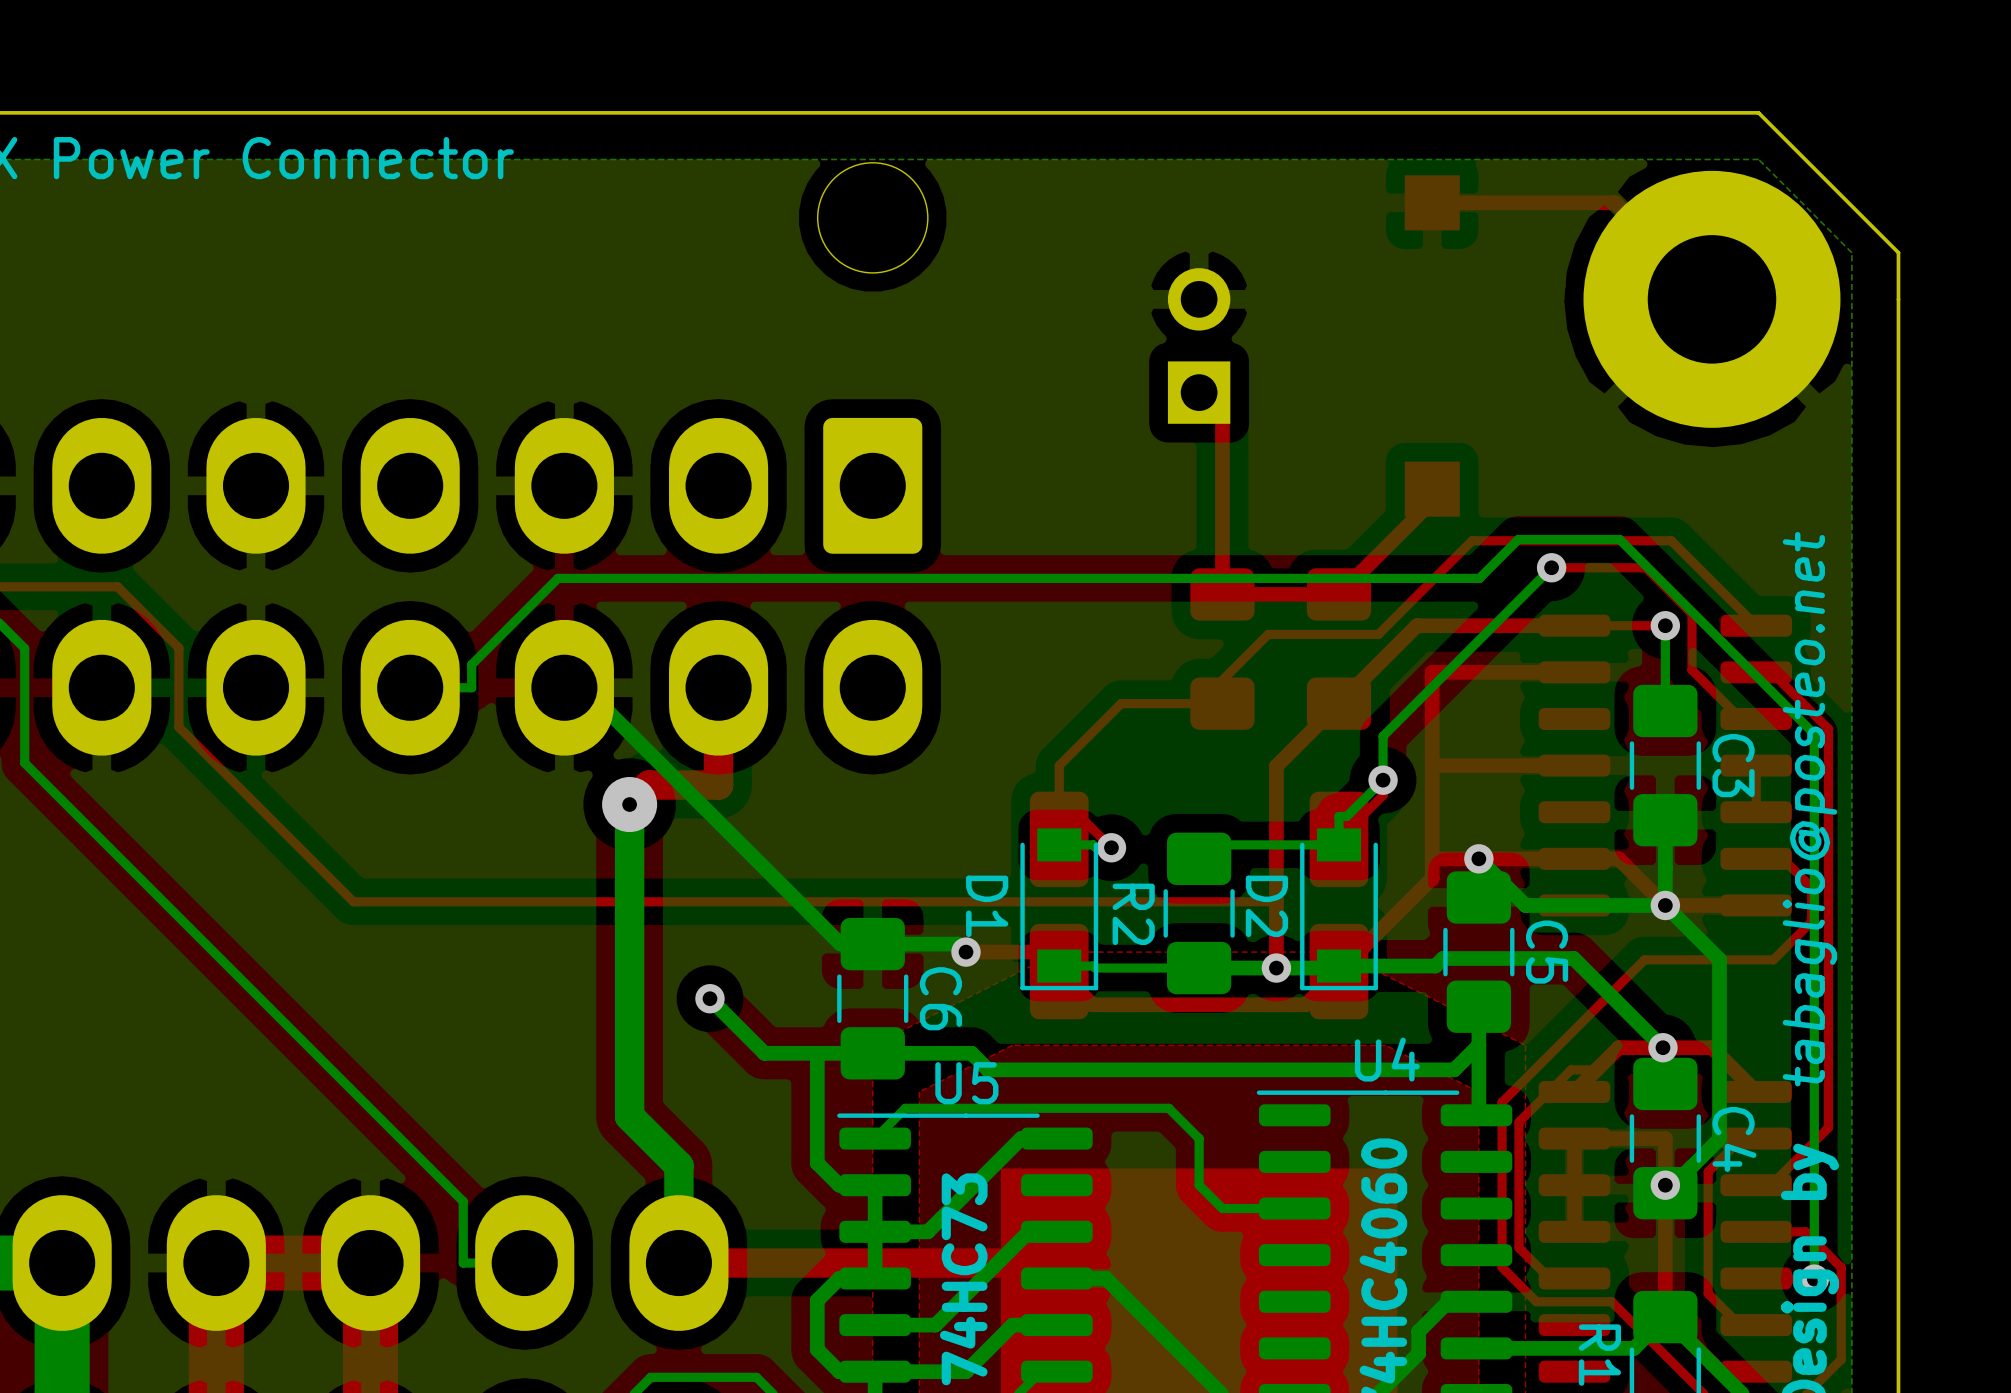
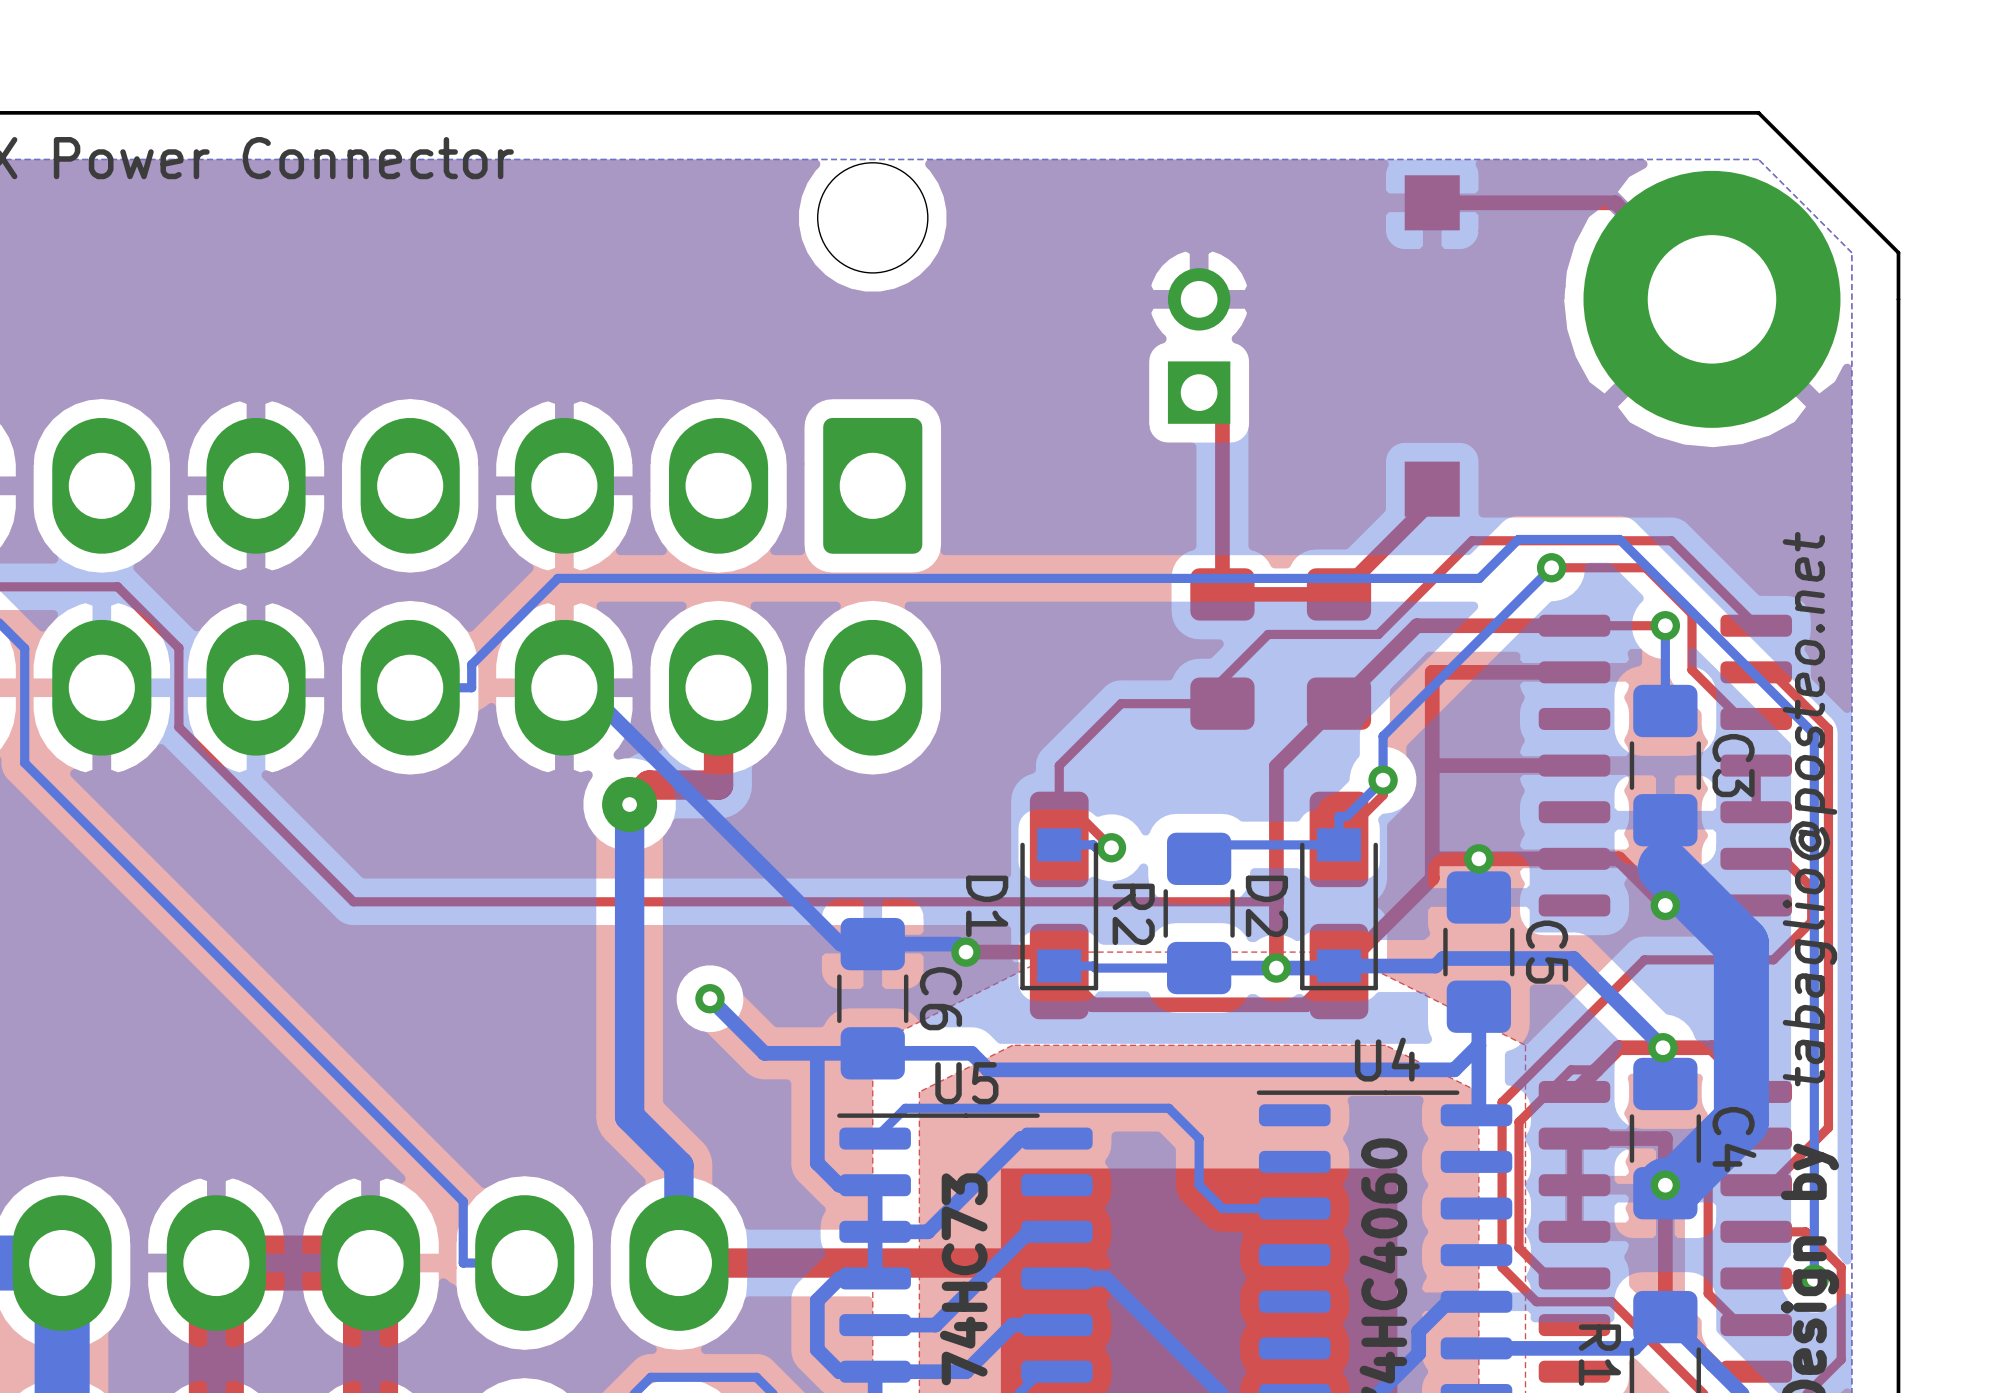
bottom track: (1478, 858) (1525, 905) (1665, 905) (1719, 959) (1719, 1139) (1665, 1193) -> none
bottom track: none -> (1665, 867) (1741, 944) (1741, 1120) (1677, 1185) (1665, 1185)

